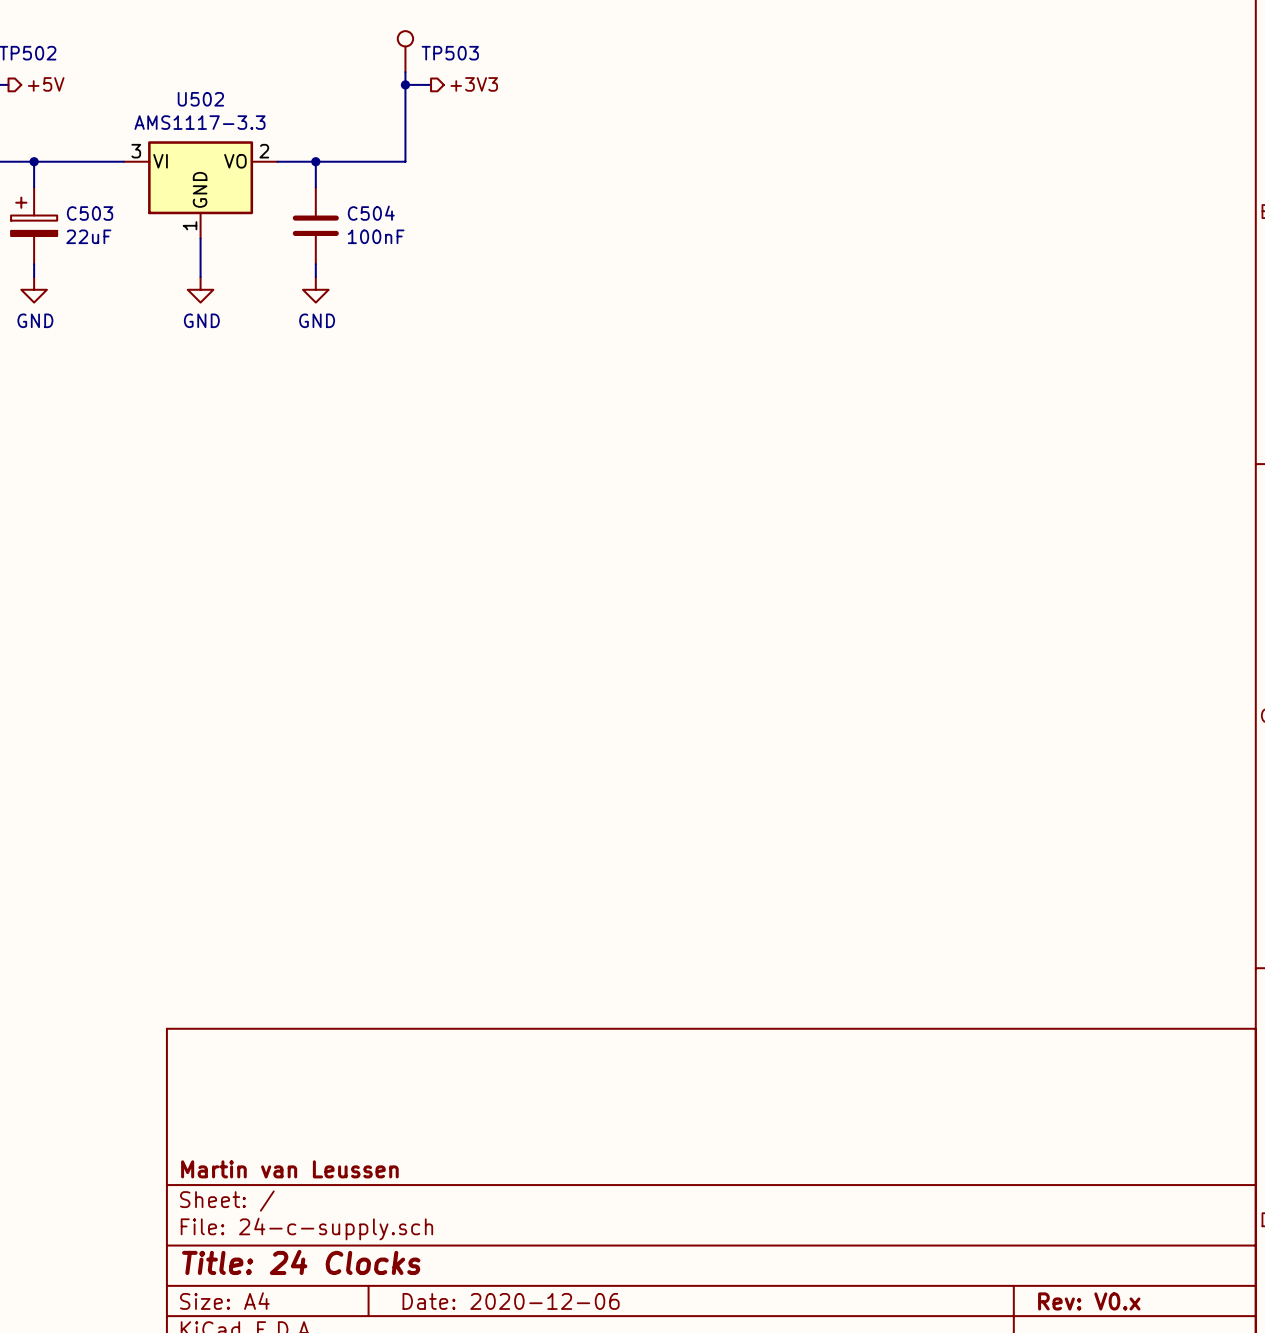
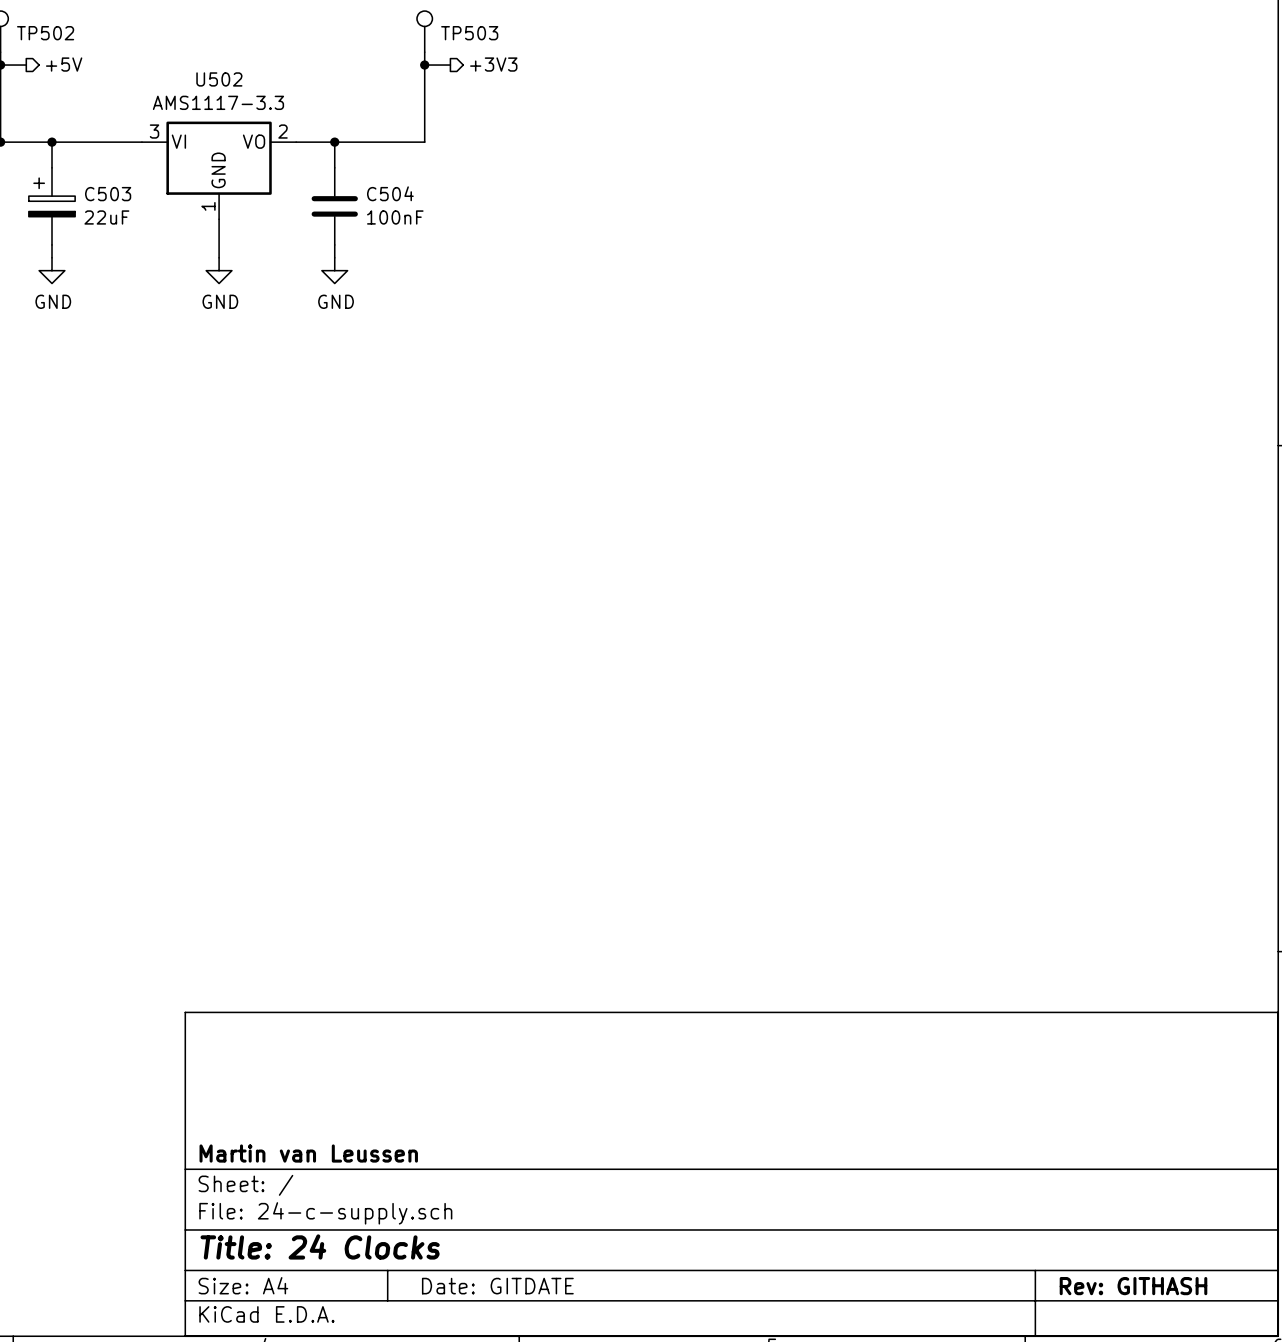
title block: Date: 2020-12-06 (511, 1301) -> Date: GITDATE (497, 1286)
title block: Rev: V0.x (1089, 1301) -> Rev: GITHASH (1133, 1286)

